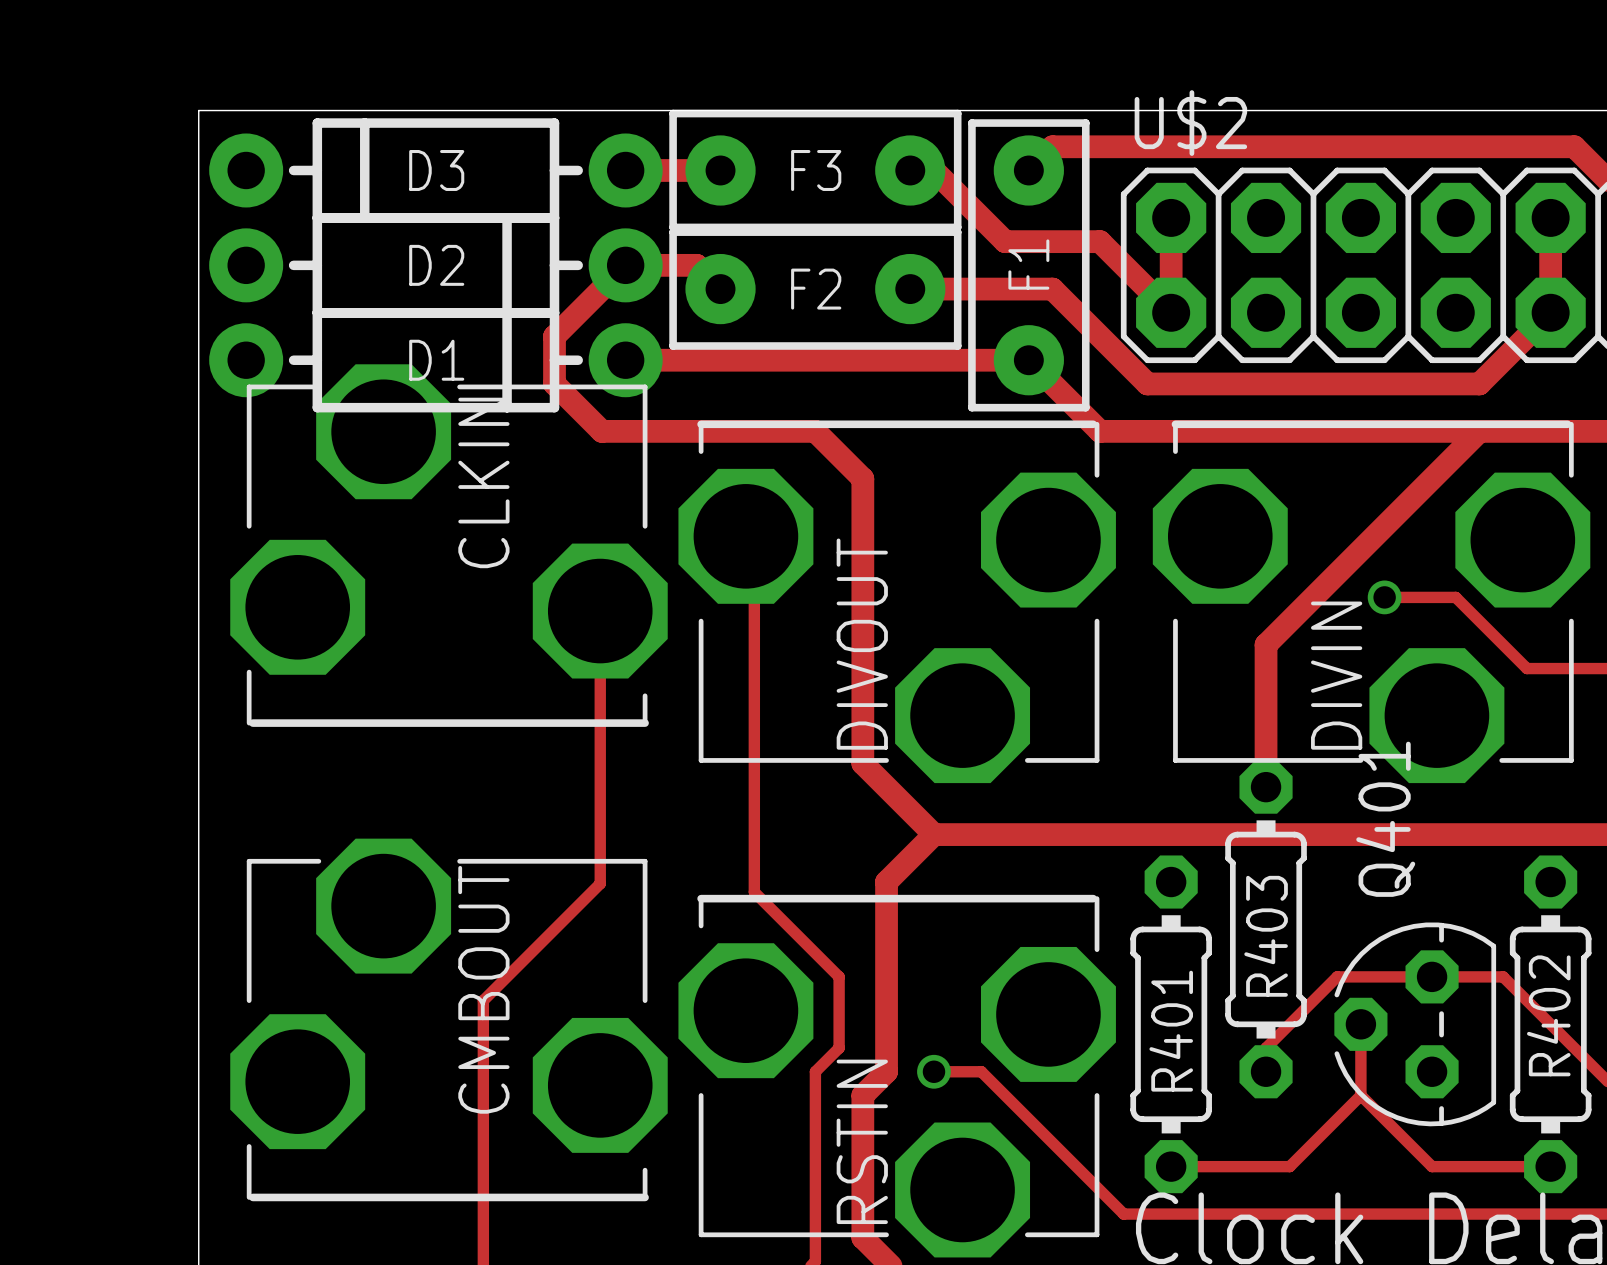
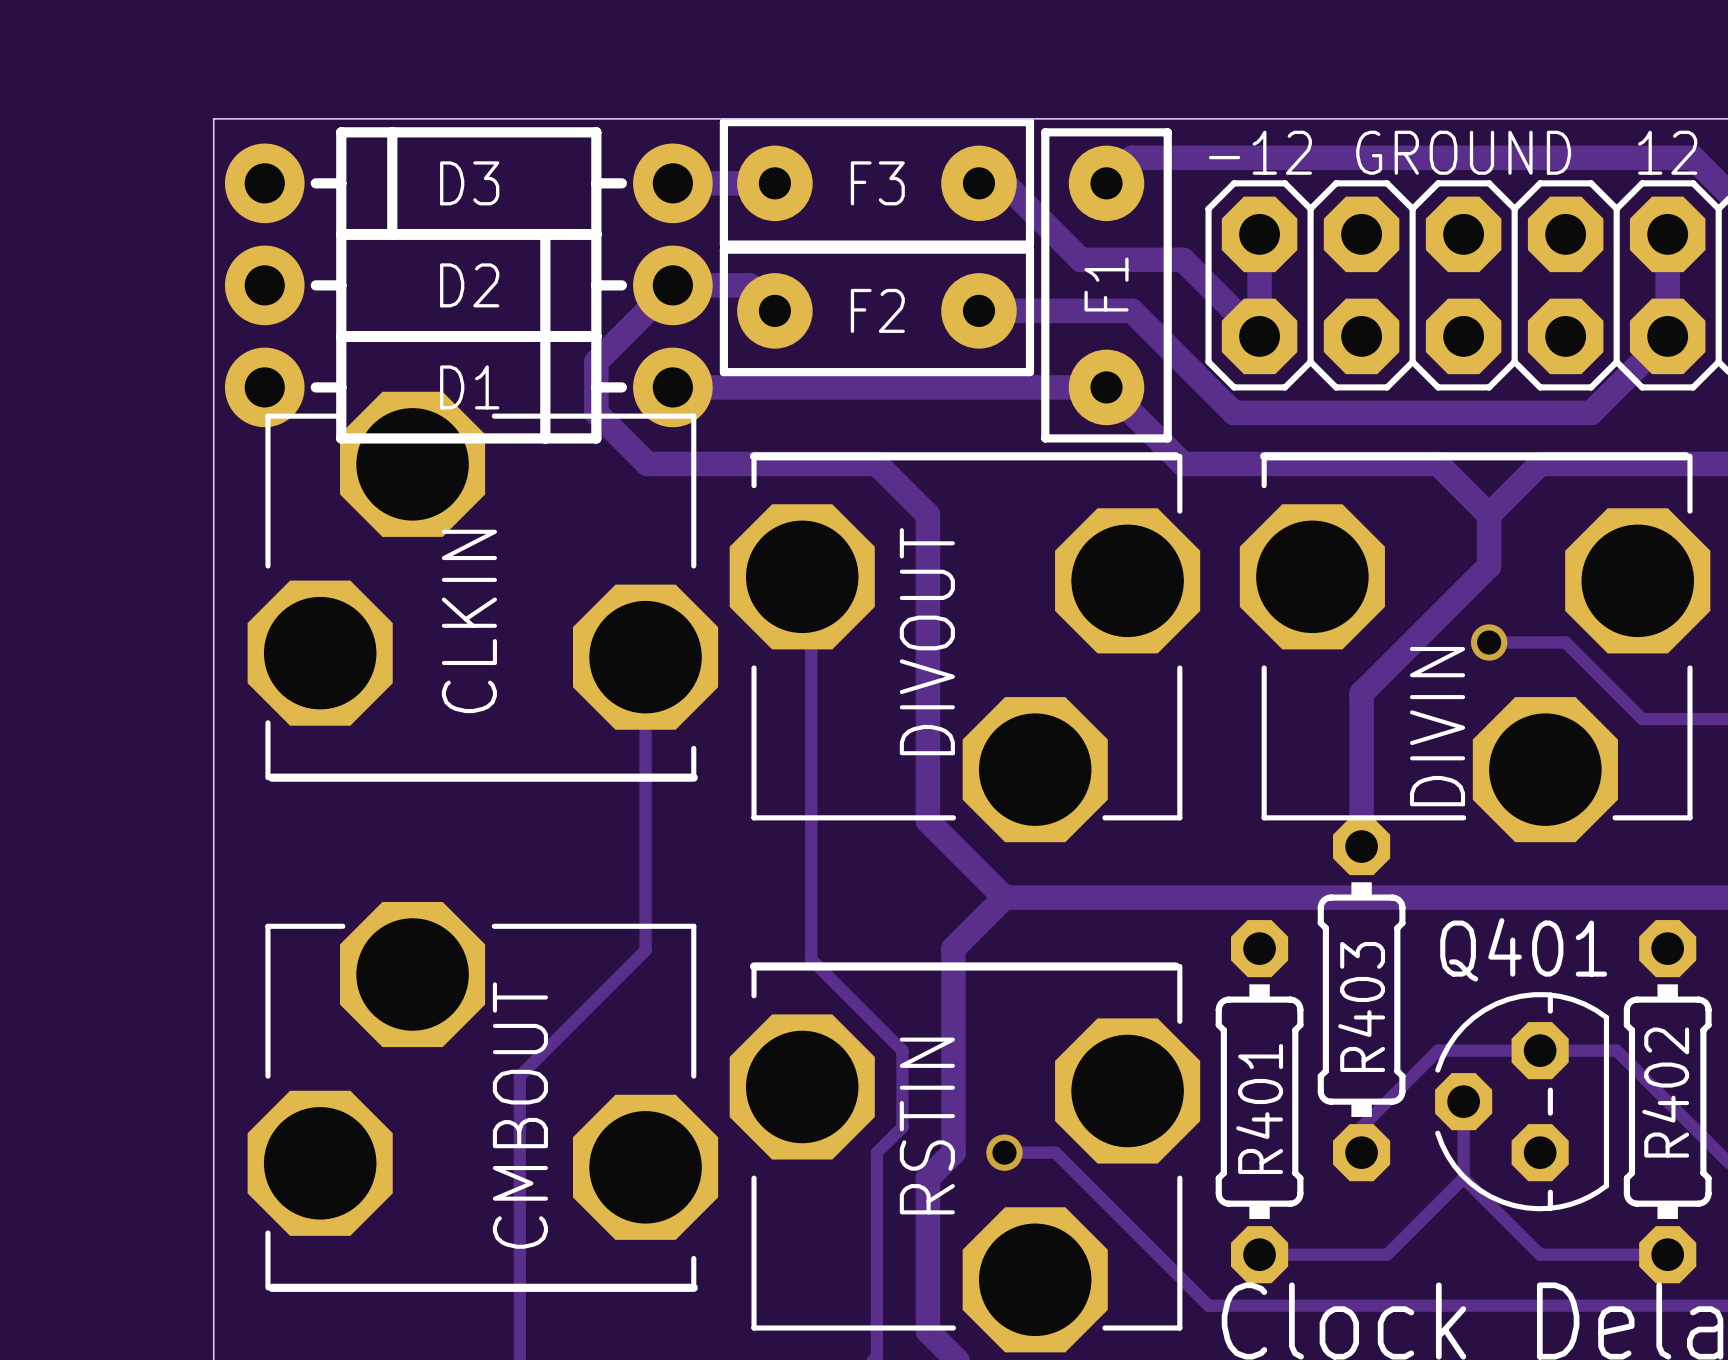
U$2 name: U$2 (1190, 123) -> none
text: none -> -12 (1260, 152)
text: none -> GROUND (1463, 152)
text: none -> 12 (1667, 152)
track: (1337, 431) (1432, 431) -> (1489, 514) (1540, 463)
track: none -> (1438, 463) (1489, 514)
track: (1479, 431) (1384, 526) -> (1489, 514) (1489, 565)
CLKIN name position: CLKIN (483, 482) -> CLKIN (469, 621)
DIVOUT name position: DIVOUT (862, 644) -> DIVOUT (927, 641)
Q401 name rotation: 0° (1385, 819) -> 90° clockwise (1523, 949)
CMBOUT name position: CMBOUT (483, 989) -> CMBOUT (520, 1115)
RSTIN name position: RSTIN (862, 1141) -> RSTIN (927, 1125)

